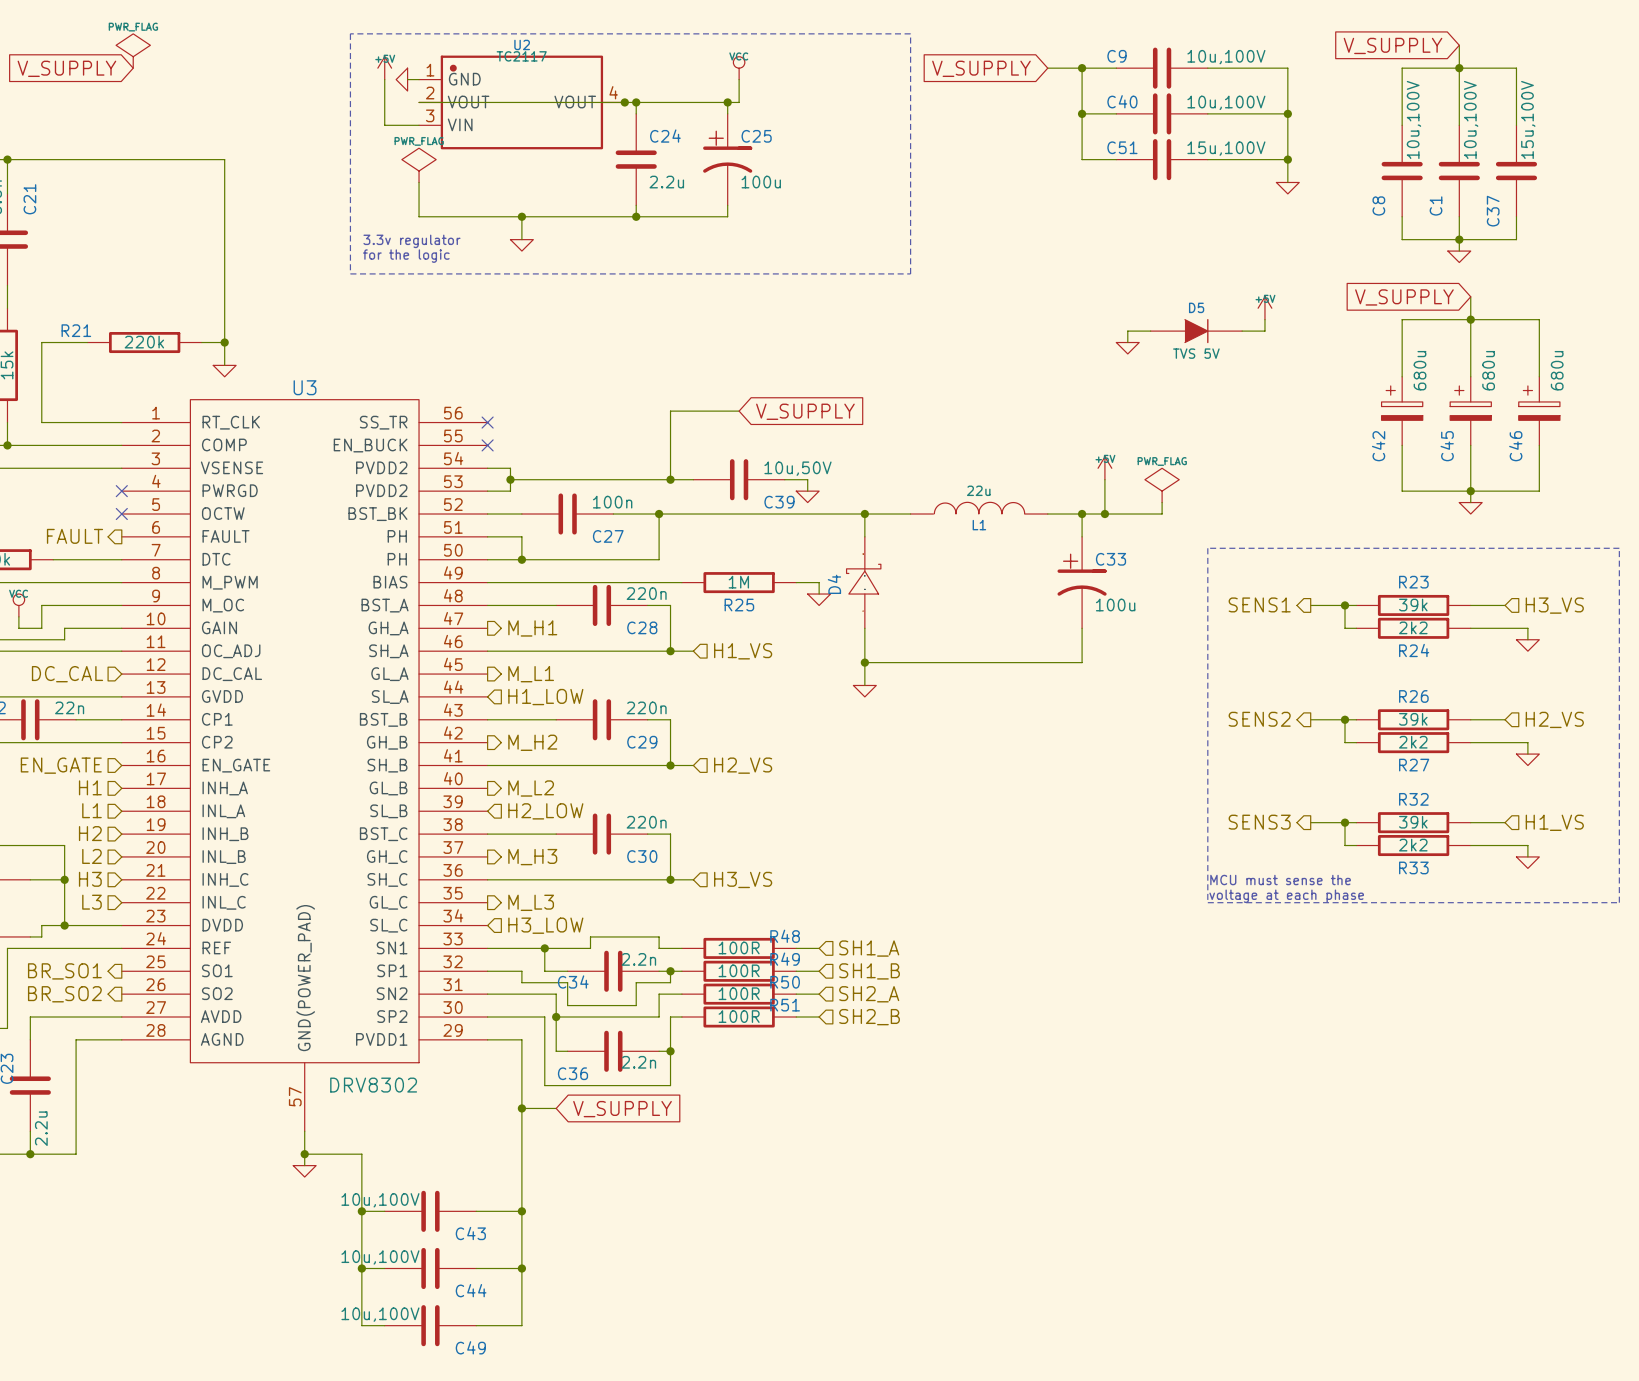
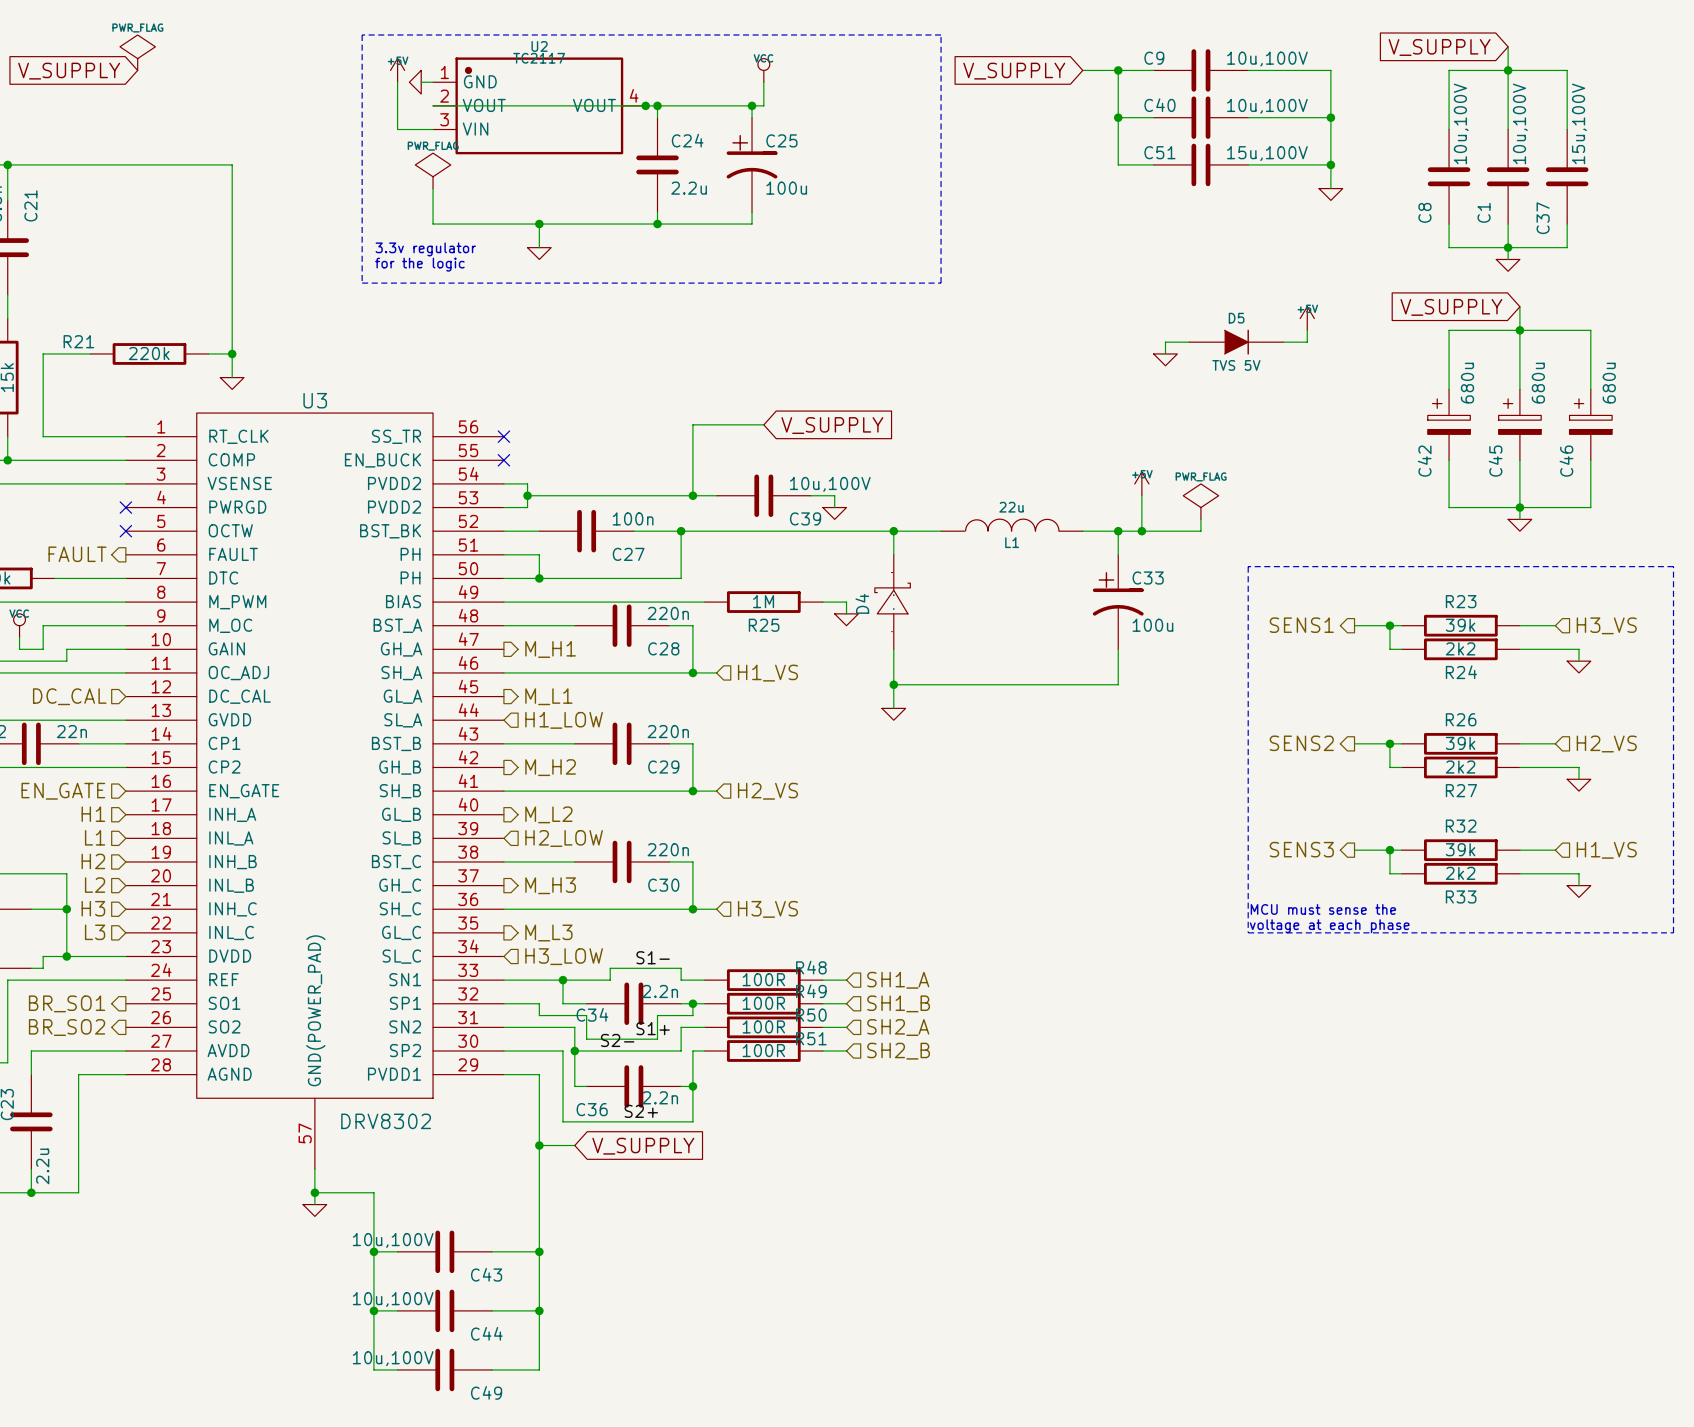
C39 value: 10u,50V (797, 468) -> 10u,100V (830, 484)
label: none -> S1- (653, 957)
label: none -> S1+ (653, 1028)
label: none -> S2- (617, 1040)
label: none -> S2+ (641, 1111)

